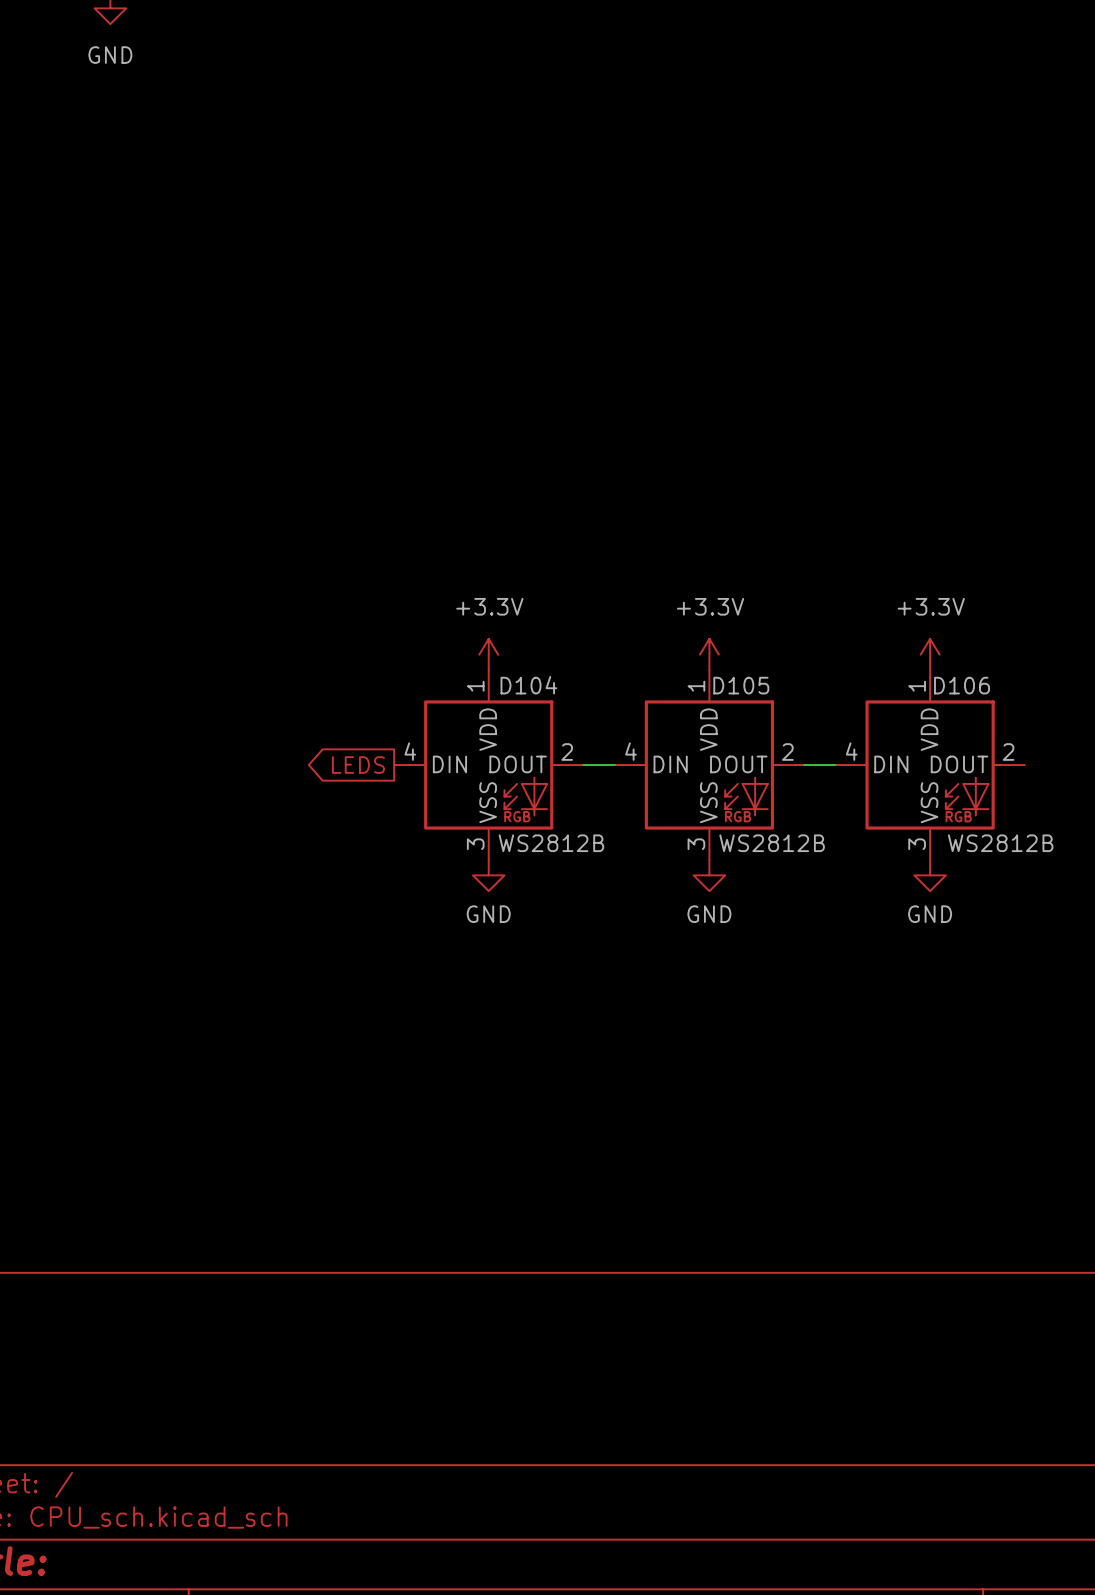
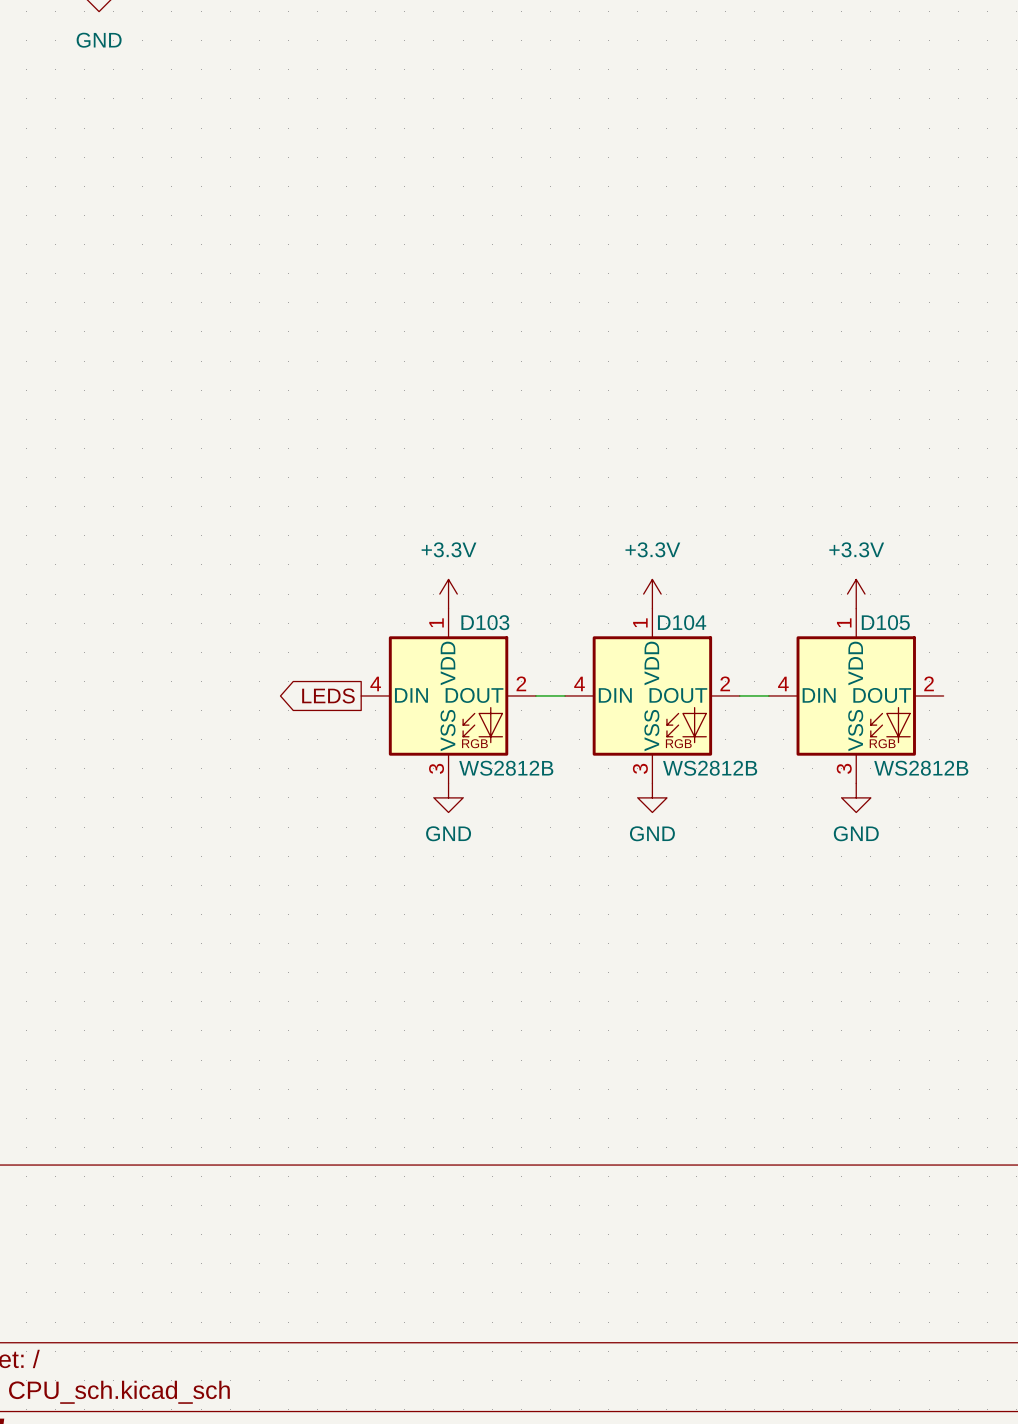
D104 name: D104 (528, 685) -> D103 (485, 622)
D105 name: D105 (741, 685) -> D104 (682, 622)
D106 name: D106 (962, 685) -> D105 (885, 622)

